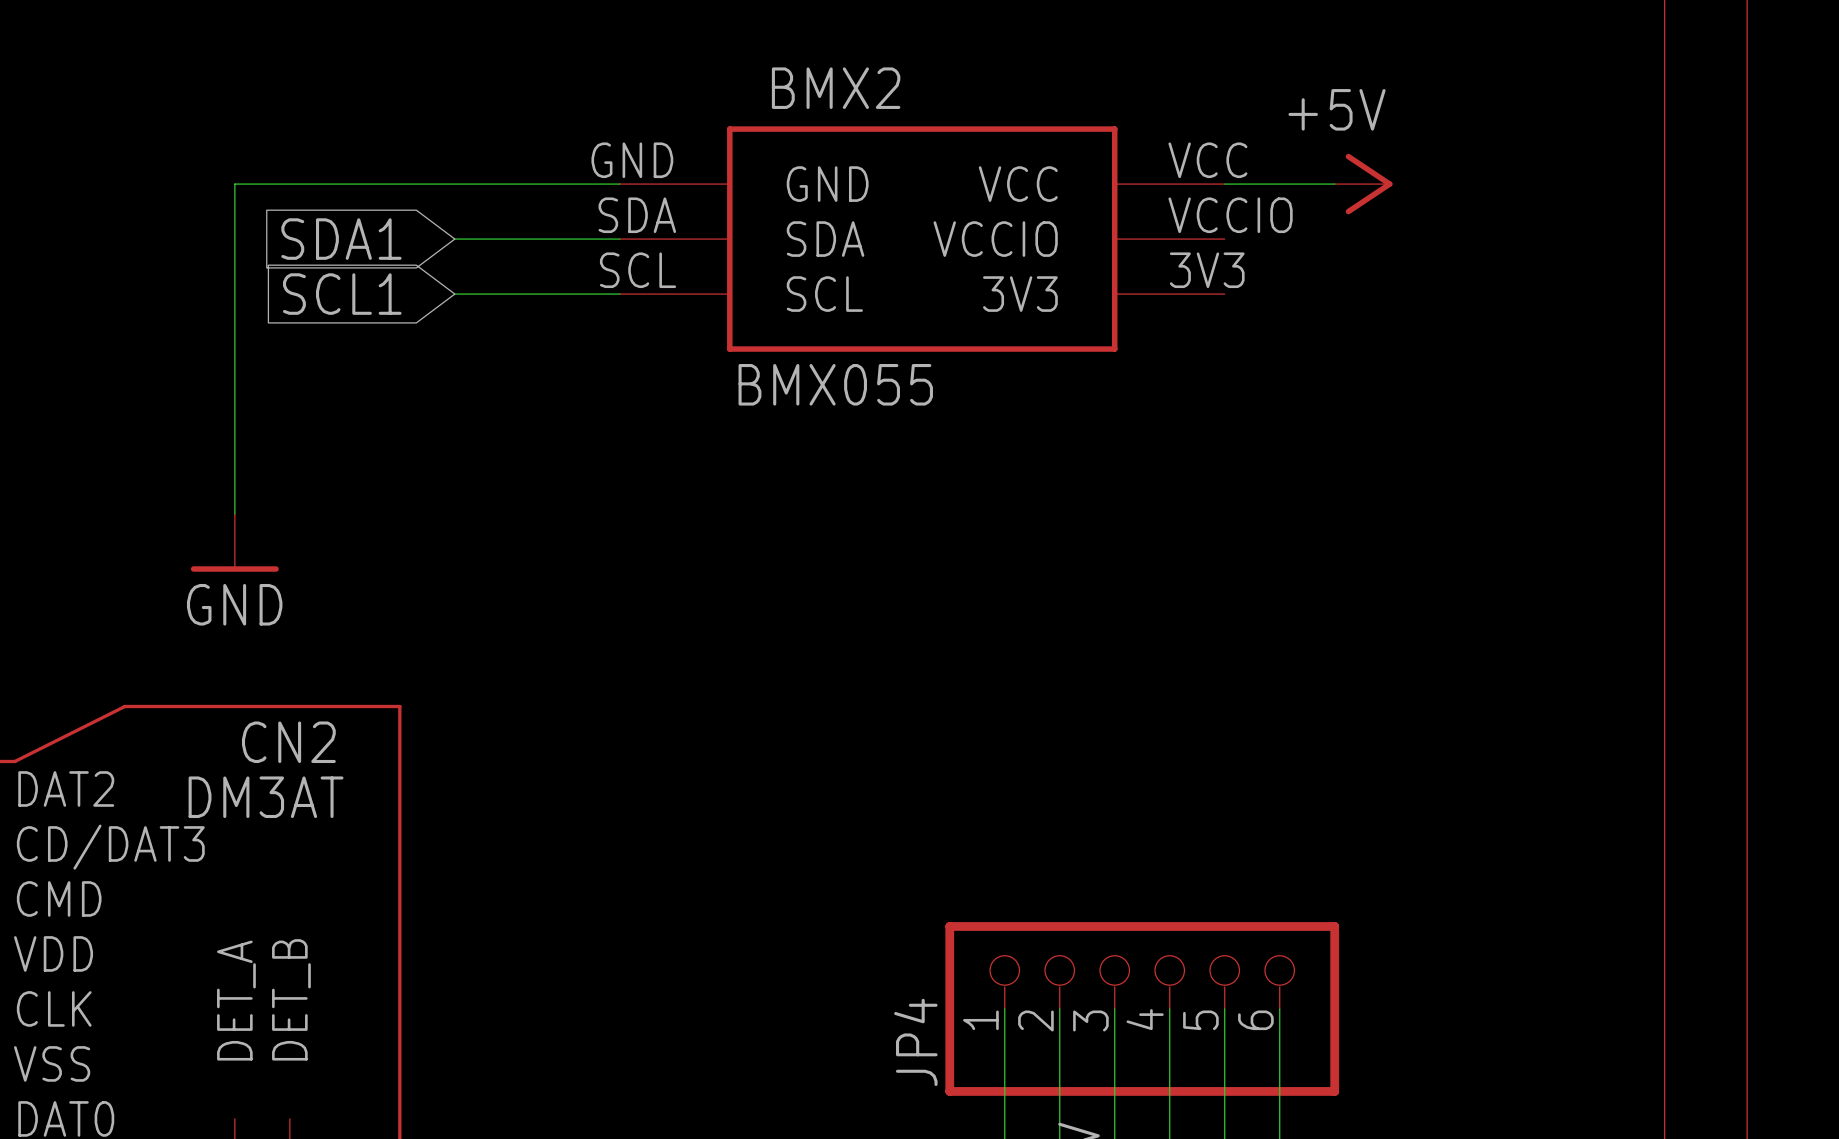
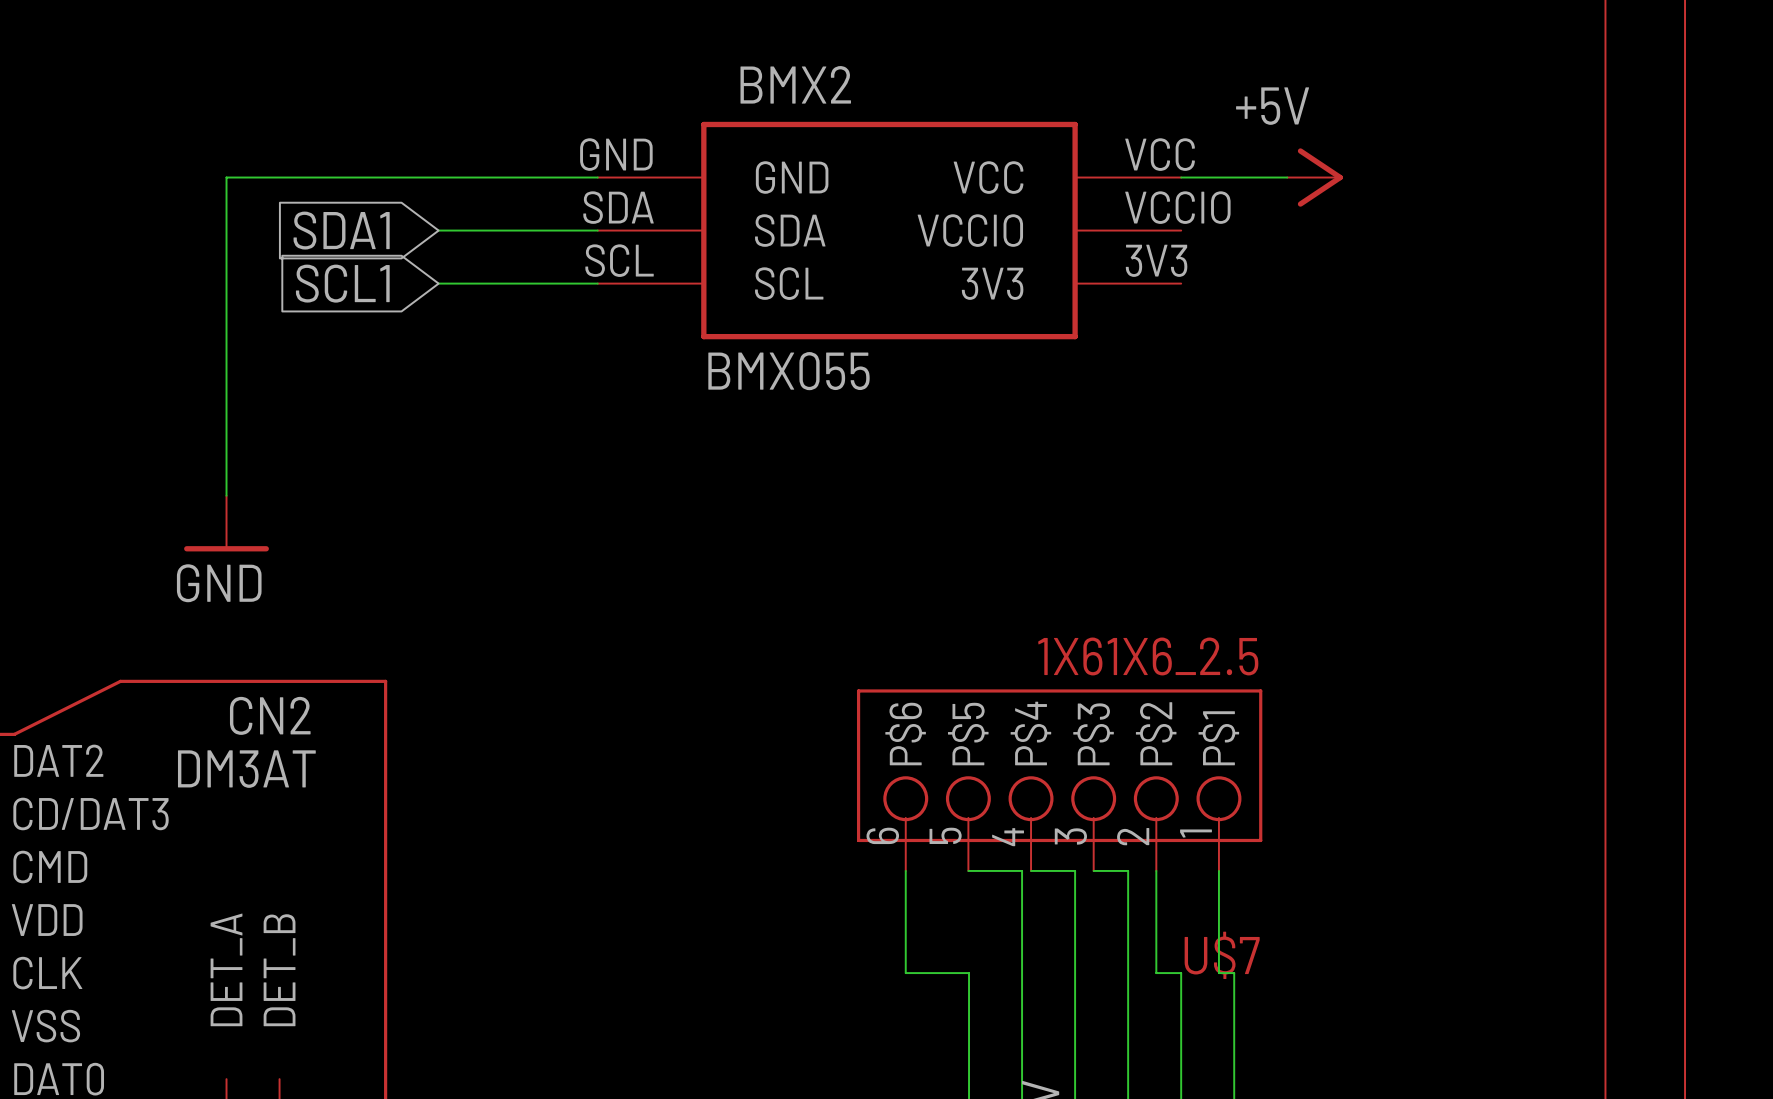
U$7: none -> 1X61X6_2.5 (1059, 780)
wire: none -> (905, 870) (905, 973) (969, 973)
wire: none -> (968, 870) (1022, 870) (1022, 973)
wire: none -> (1031, 870) (1075, 870) (1075, 973)
wire: none -> (1093, 870) (1128, 870) (1128, 973)
wire: none -> (1156, 870) (1156, 973) (1181, 973)
wire: none -> (1218, 870) (1218, 973) (1234, 973)
JP4: (1142, 1008) -> none

